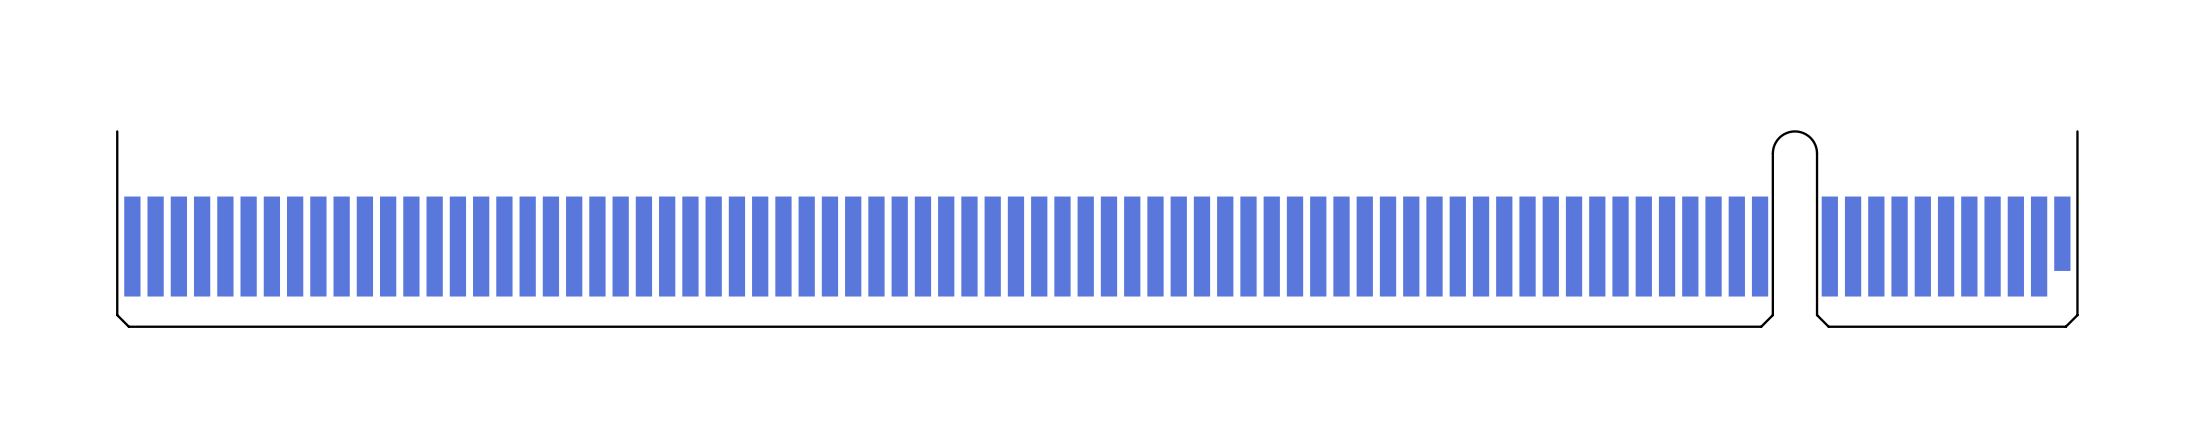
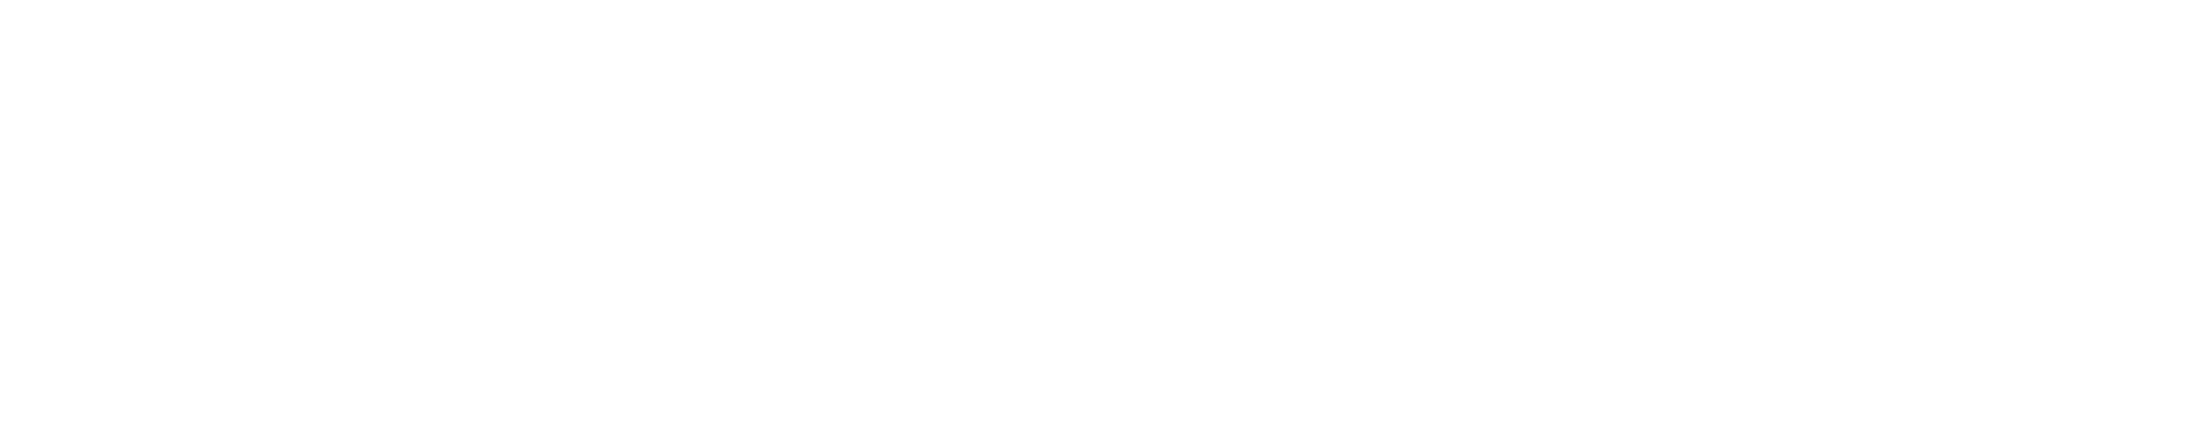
part: (1097, 229) -> none

